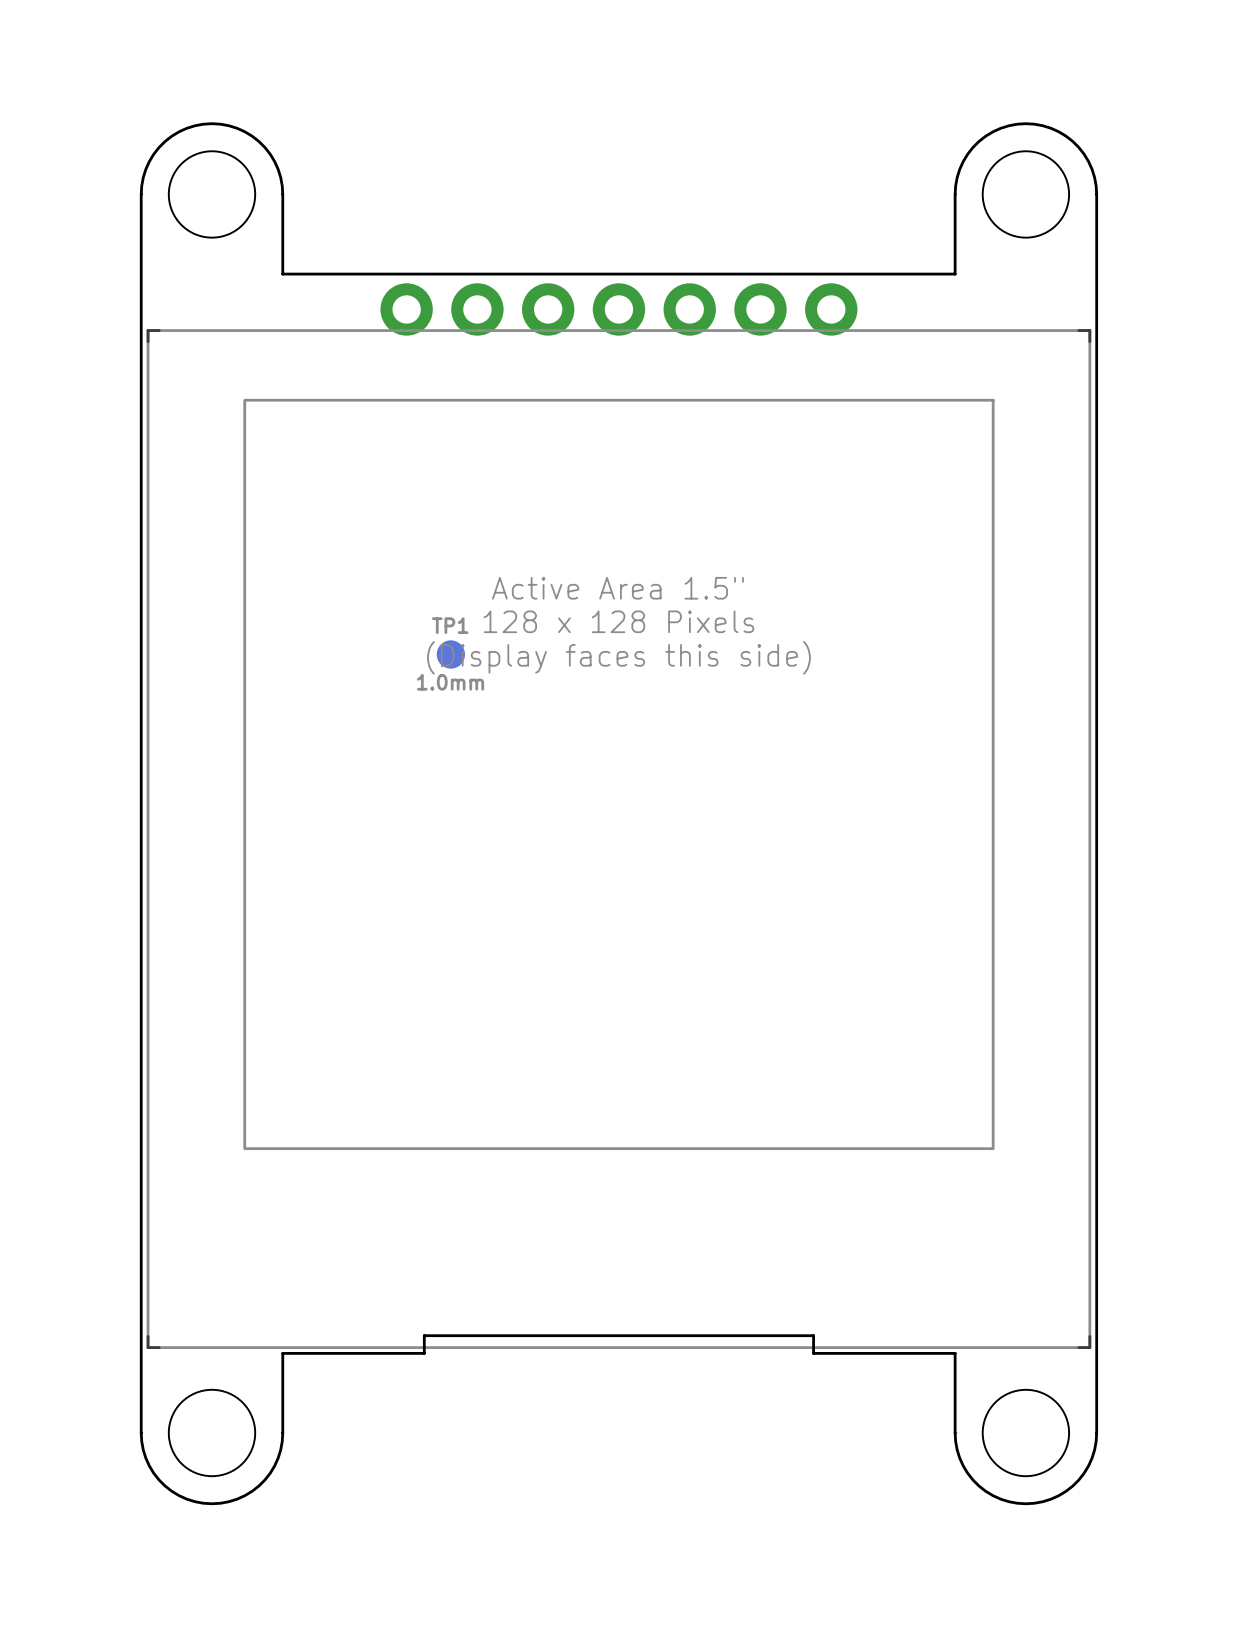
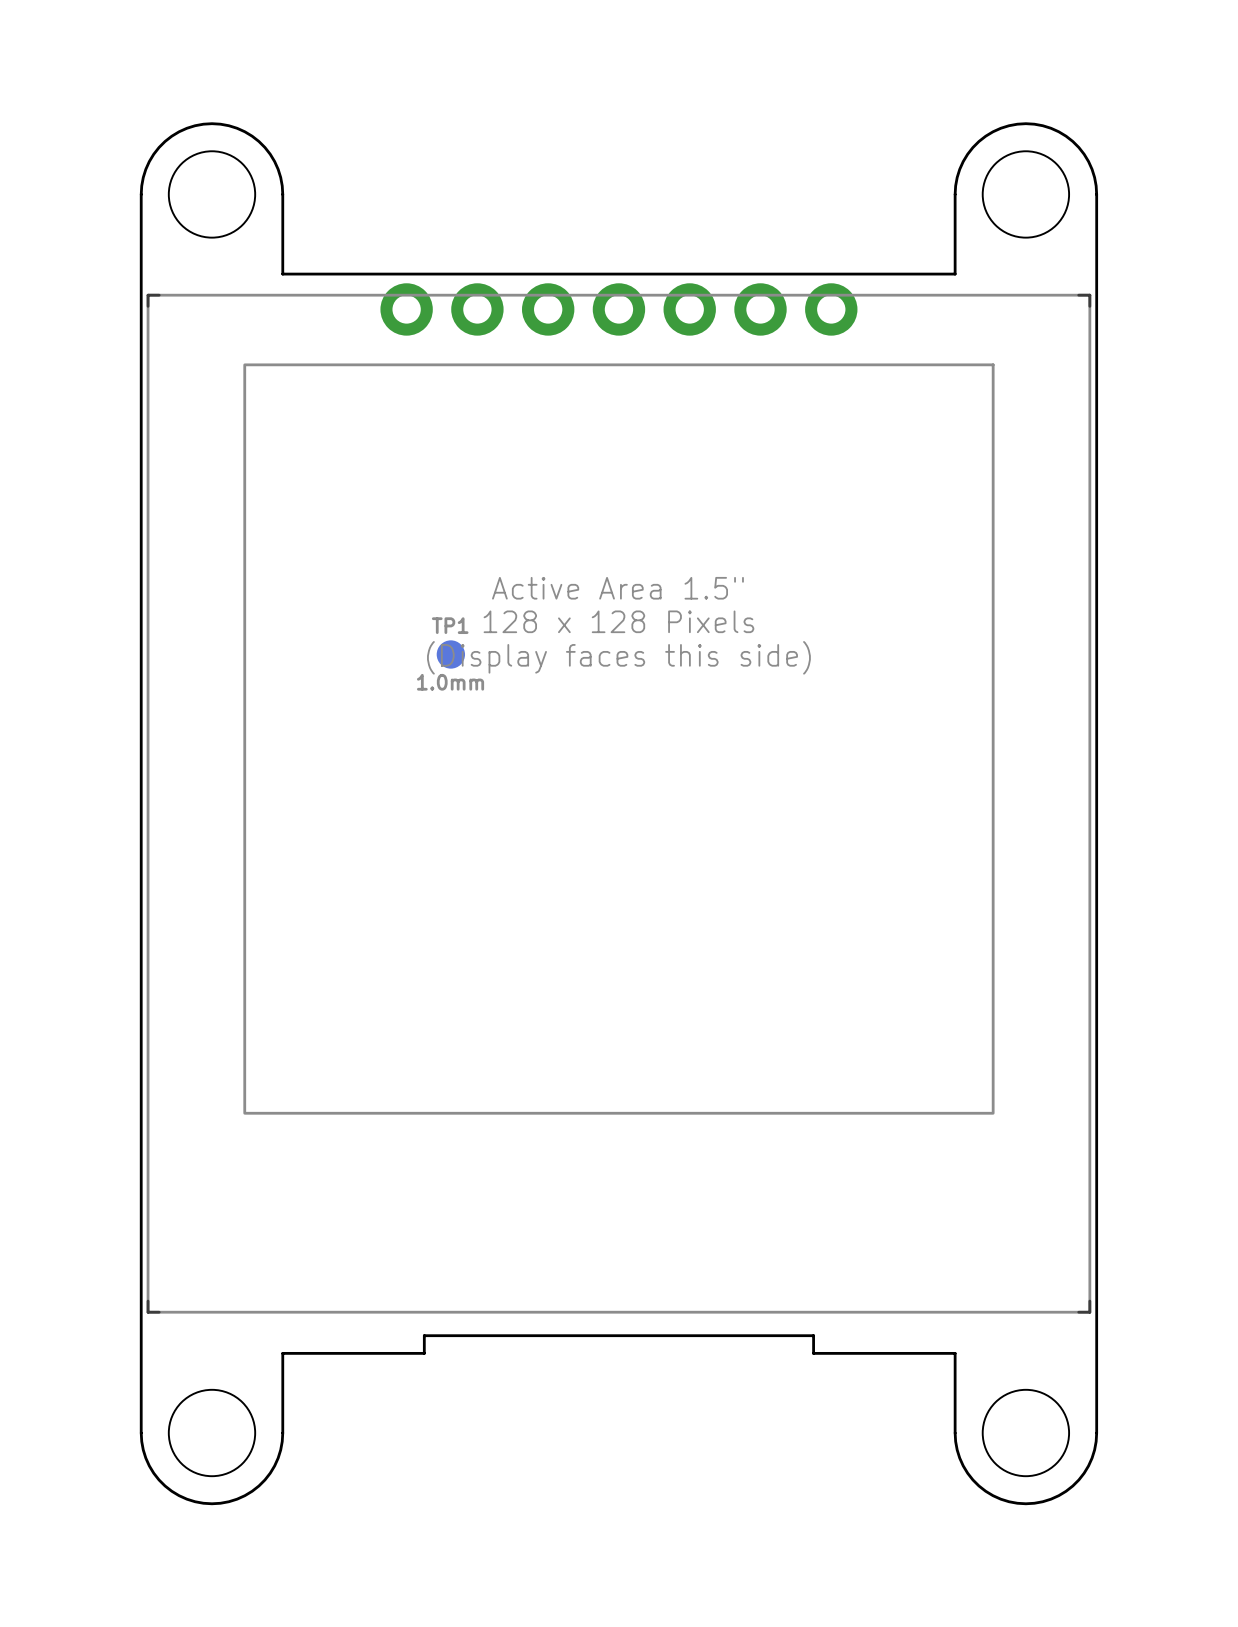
drawing: none -> [146, 293, 1092, 1314]
drawing: [146, 329, 1092, 1349] -> none

